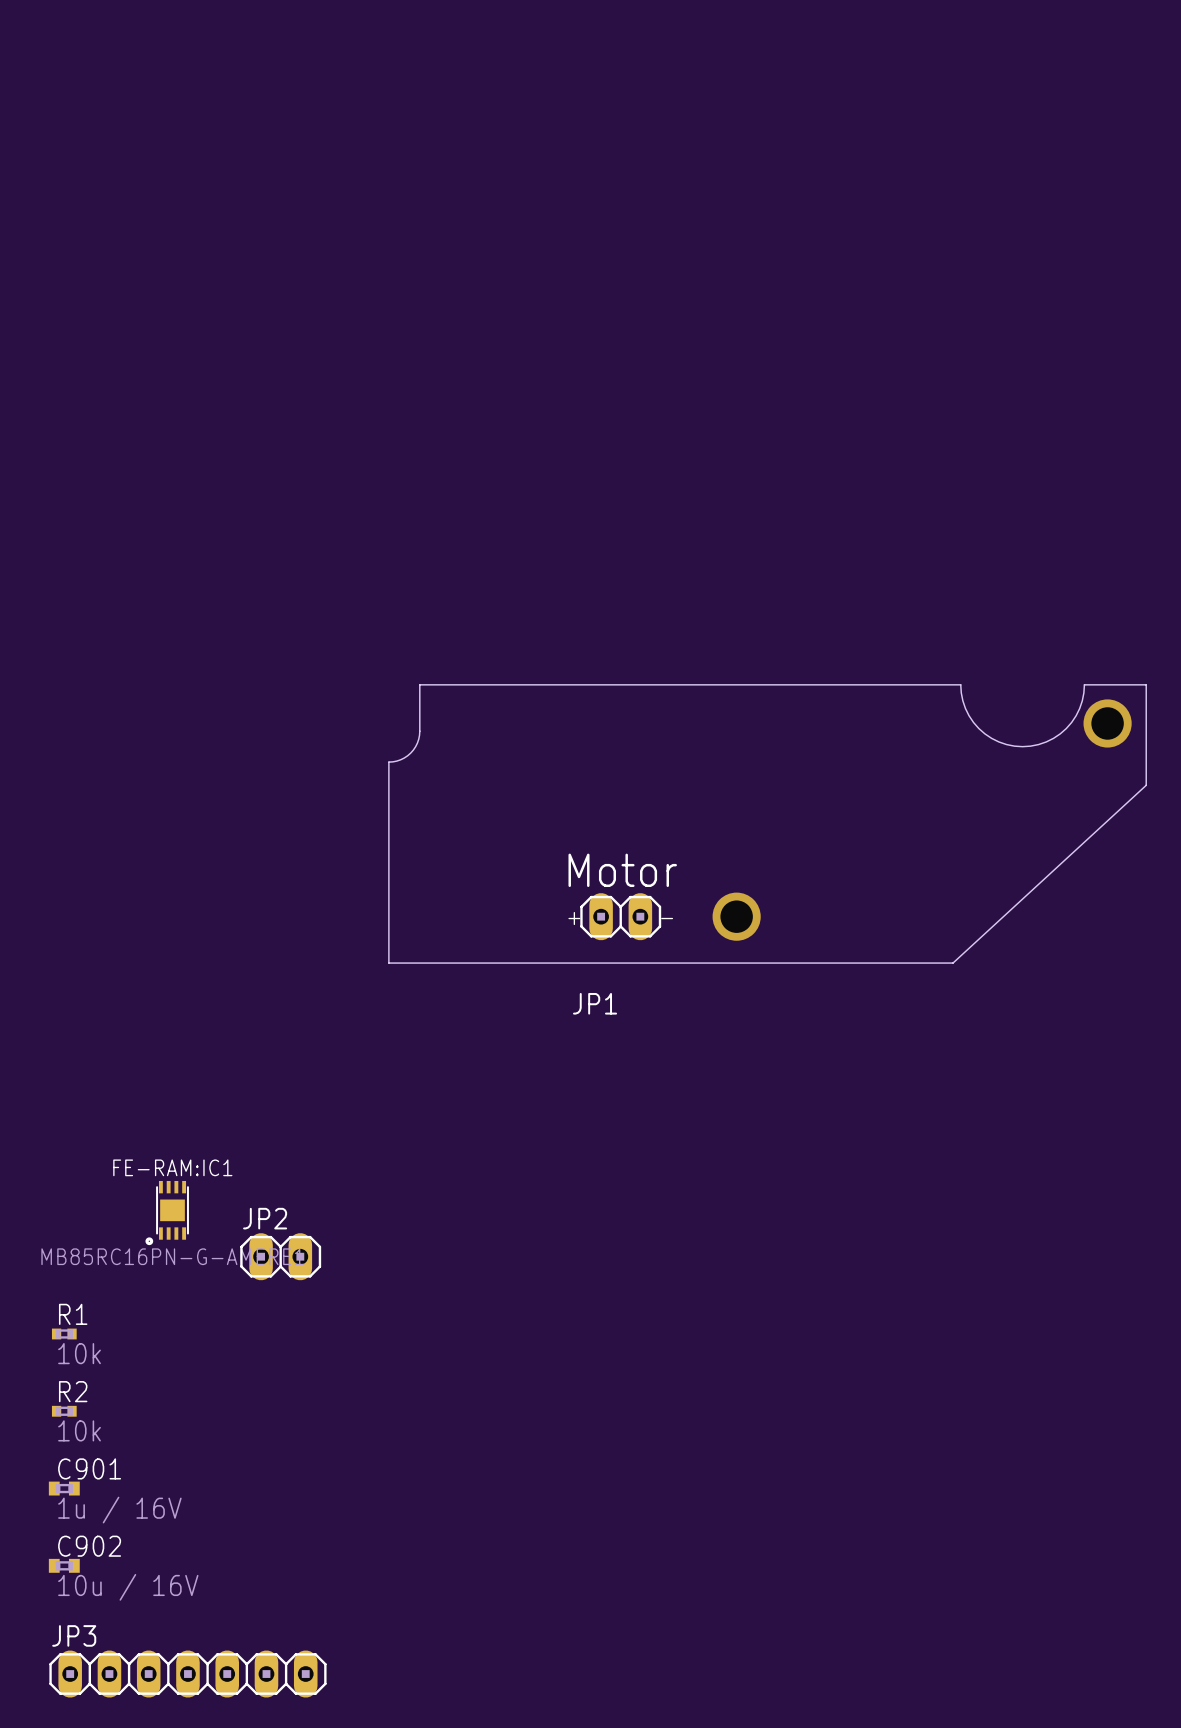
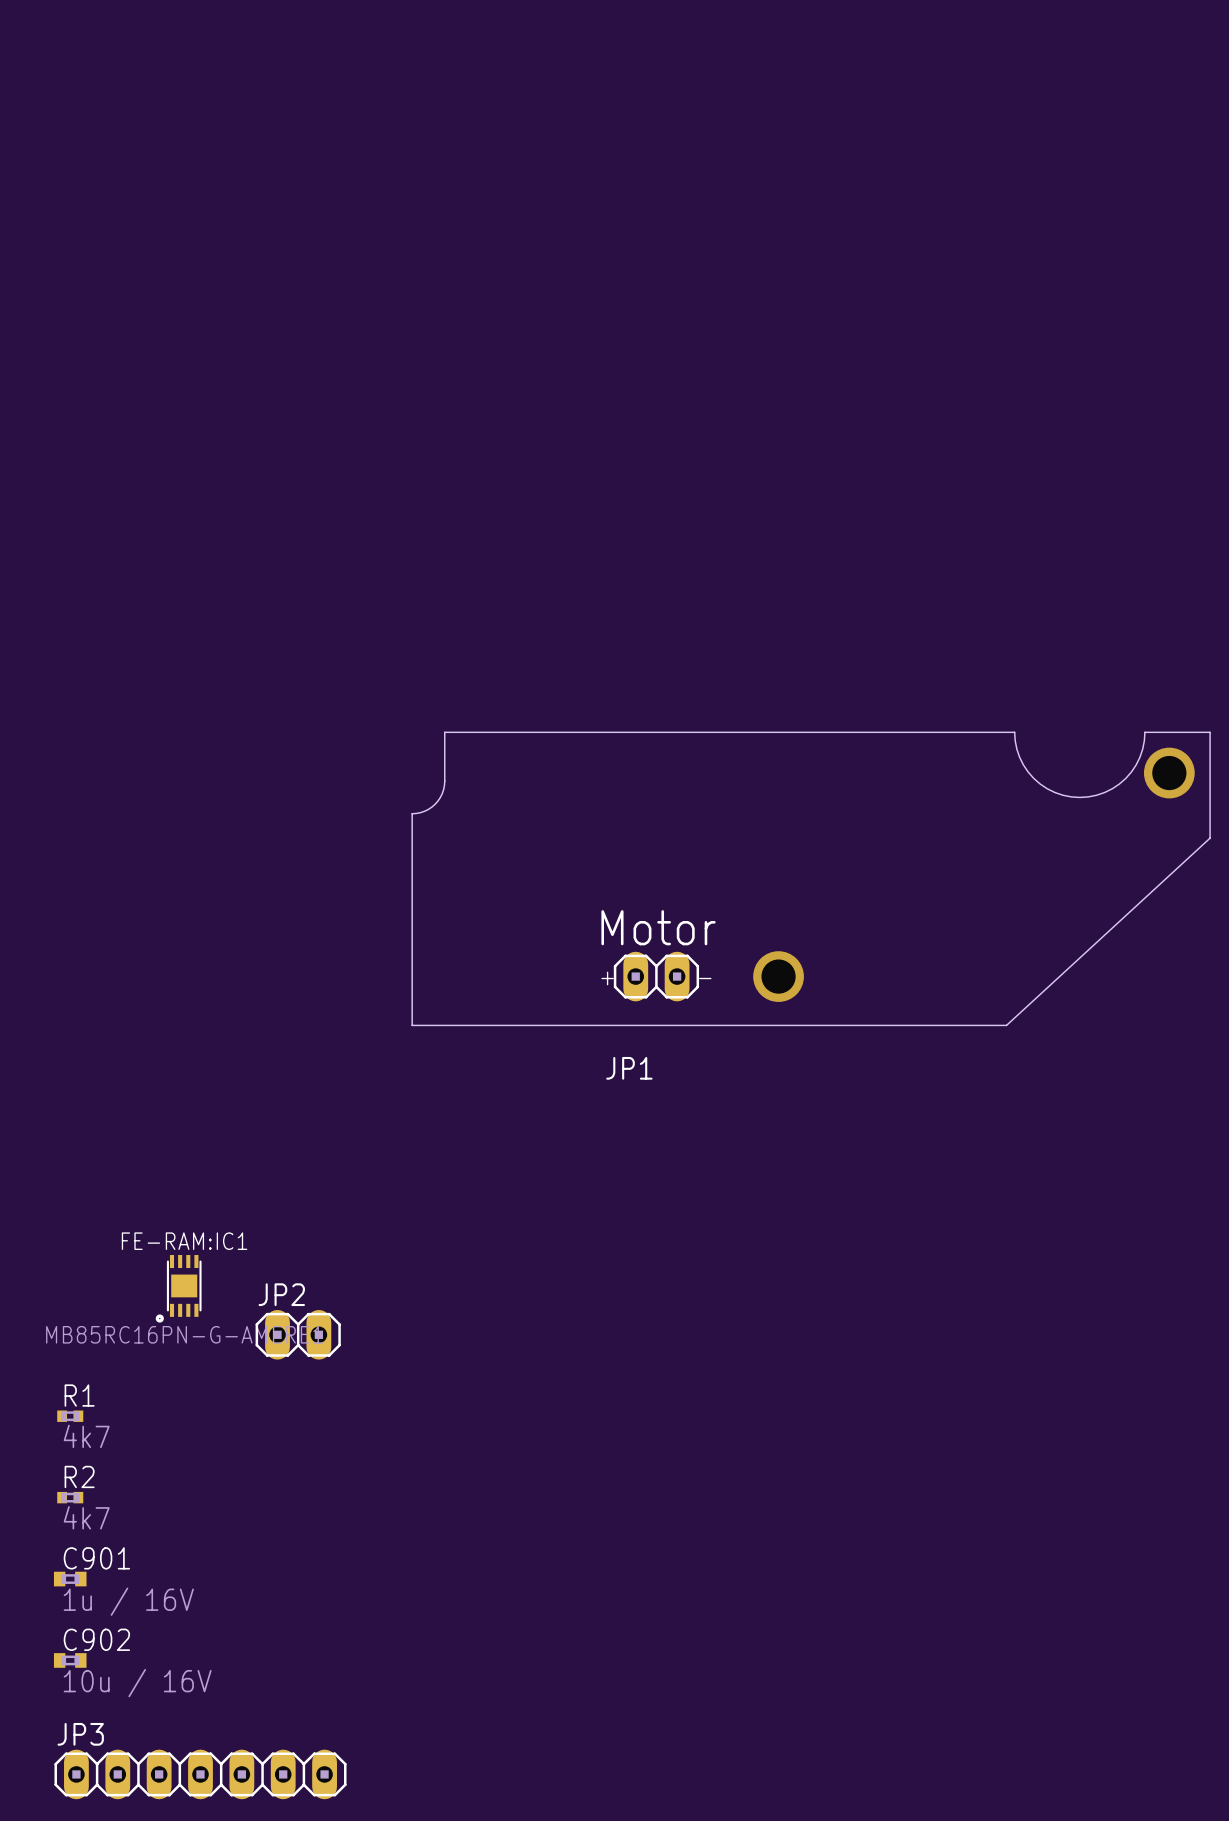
R1 value: 10k (79, 1353) -> 4k7 (86, 1436)
R2 value: 10k (79, 1430) -> 4k7 (86, 1517)

